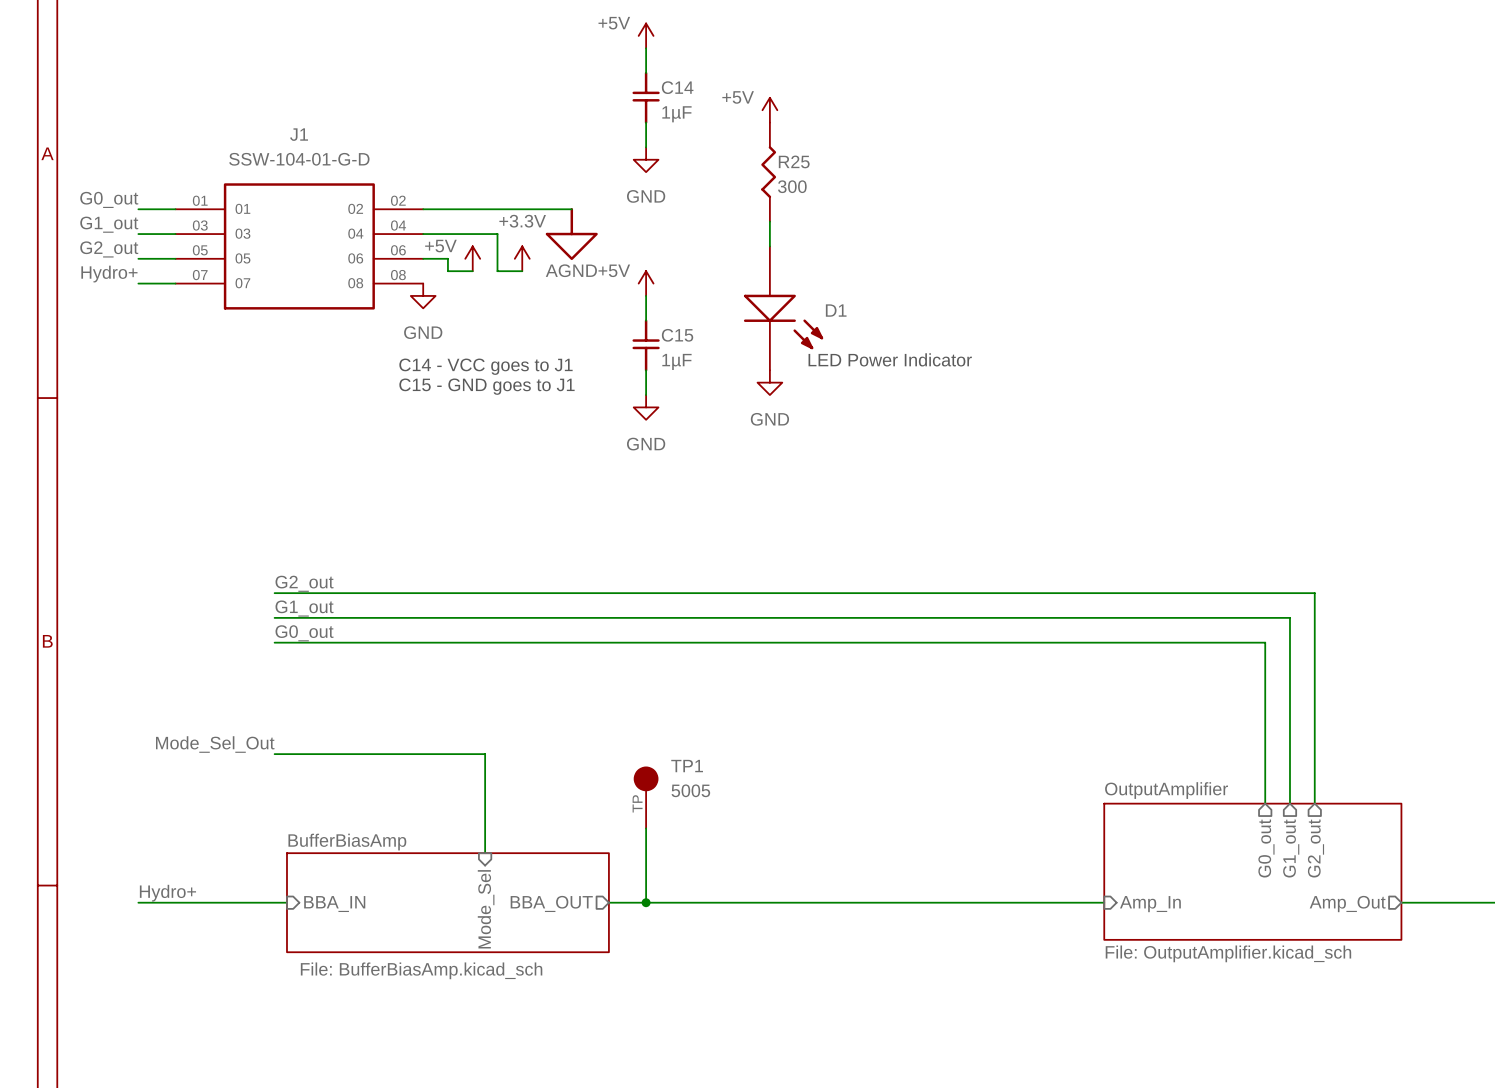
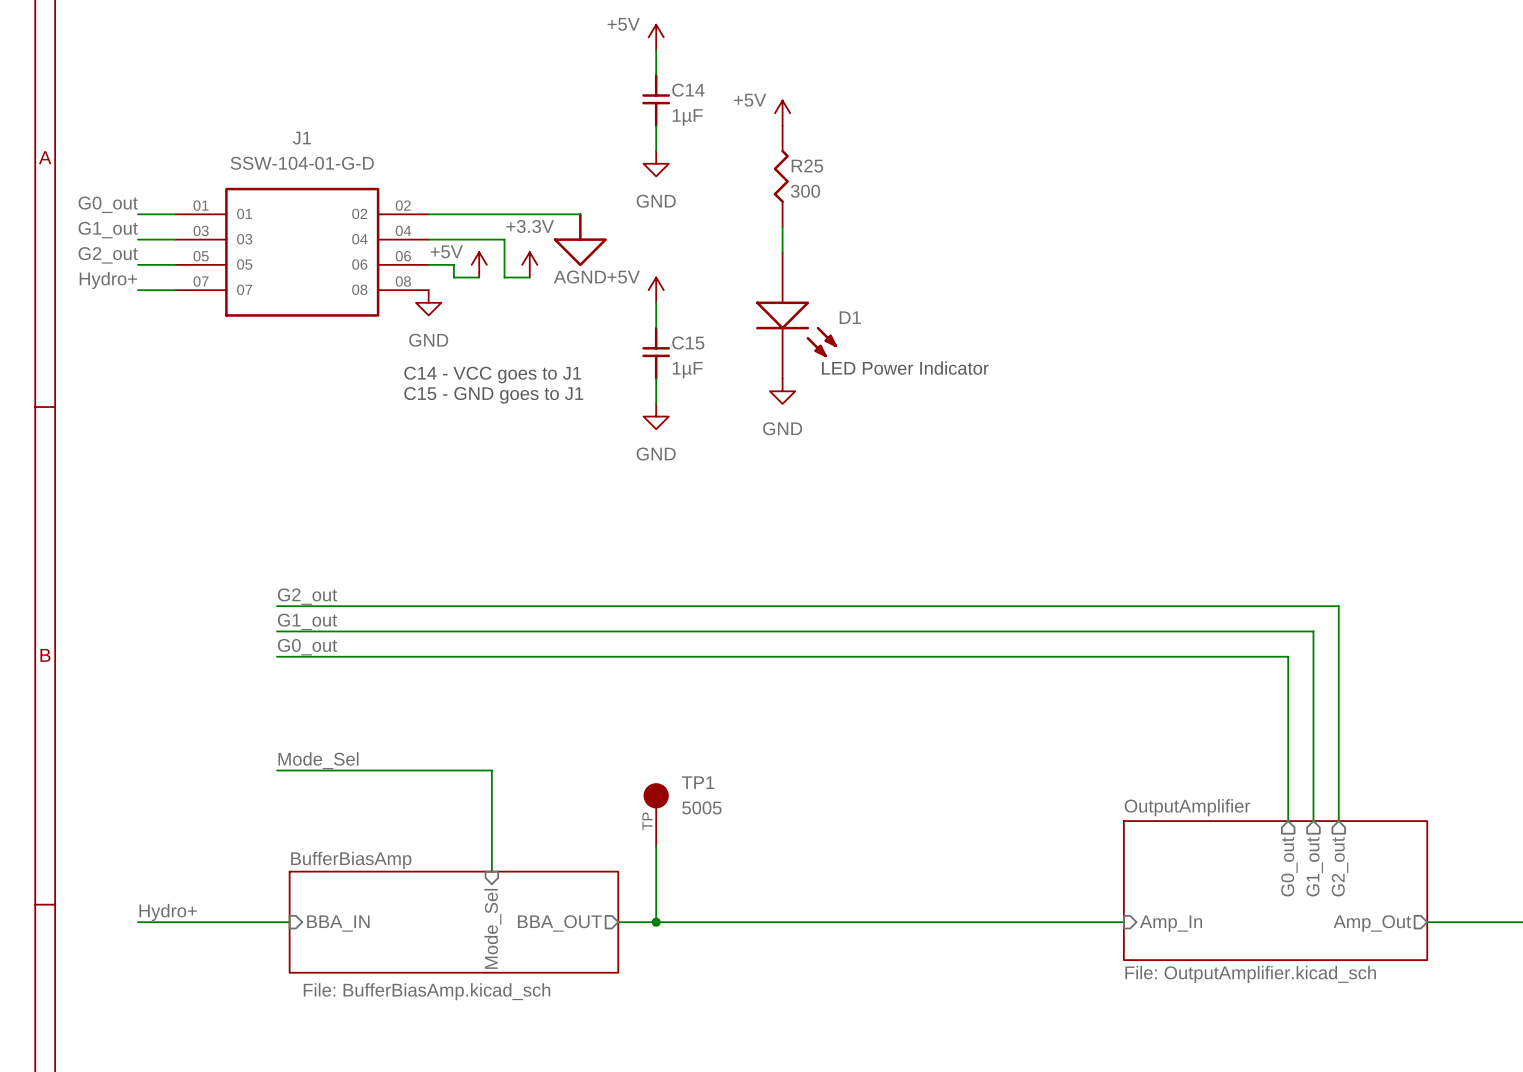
label: Mode_Sel_Out (215, 744) -> Mode_Sel (318, 760)

